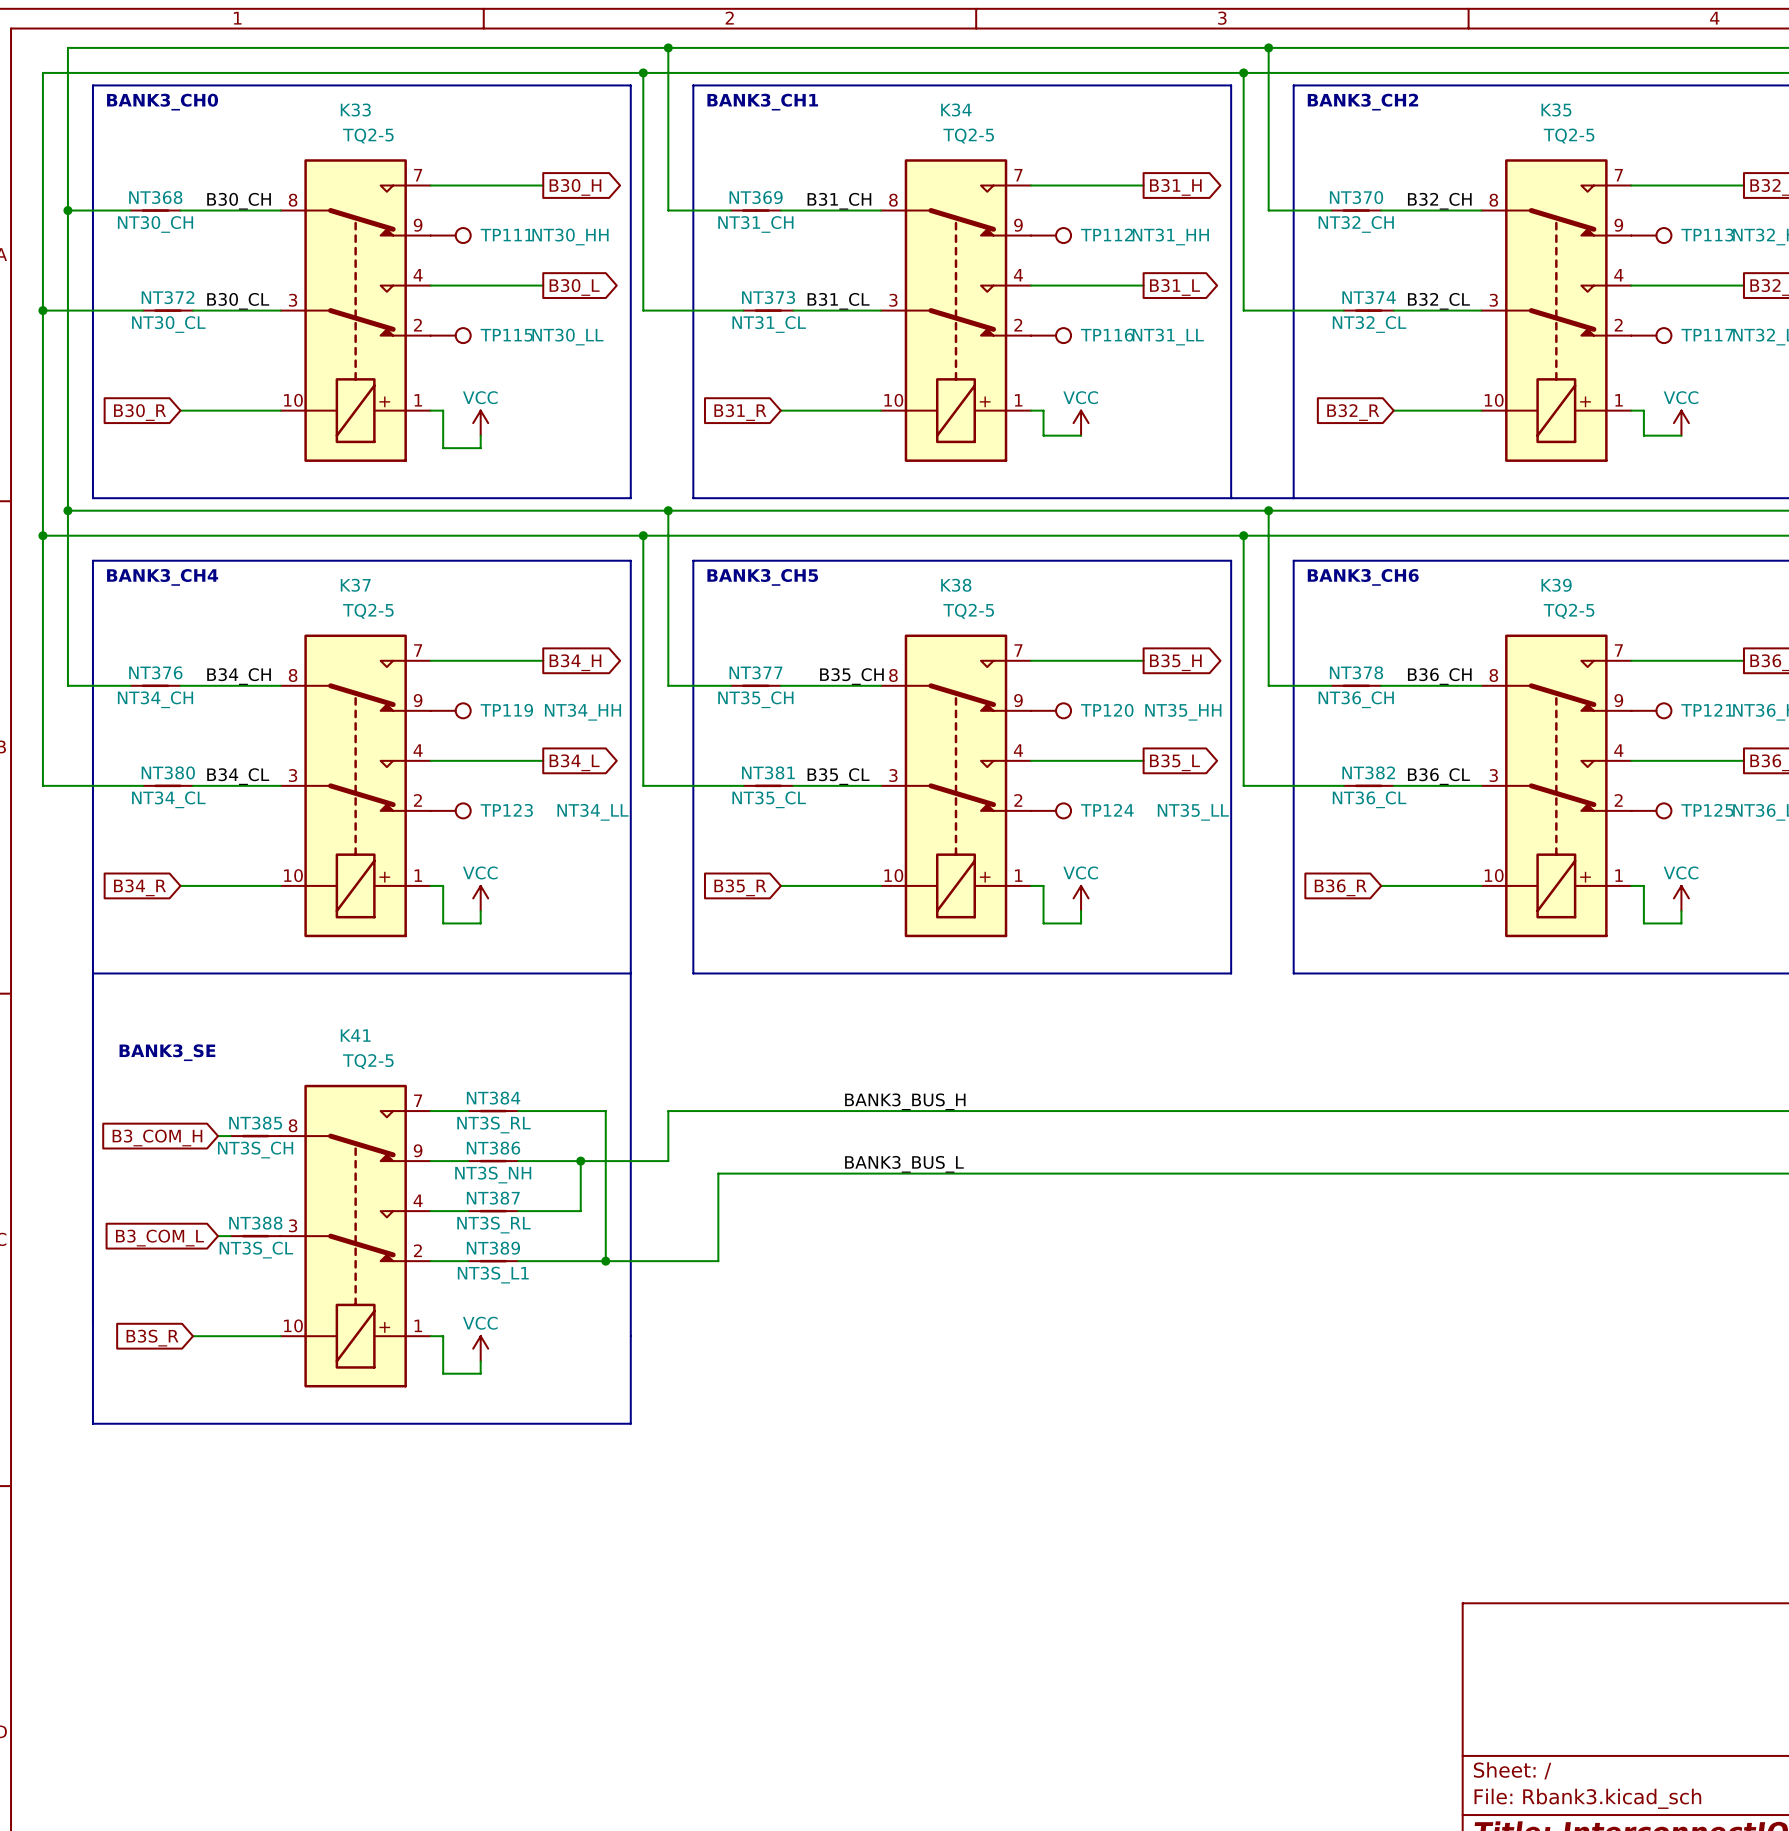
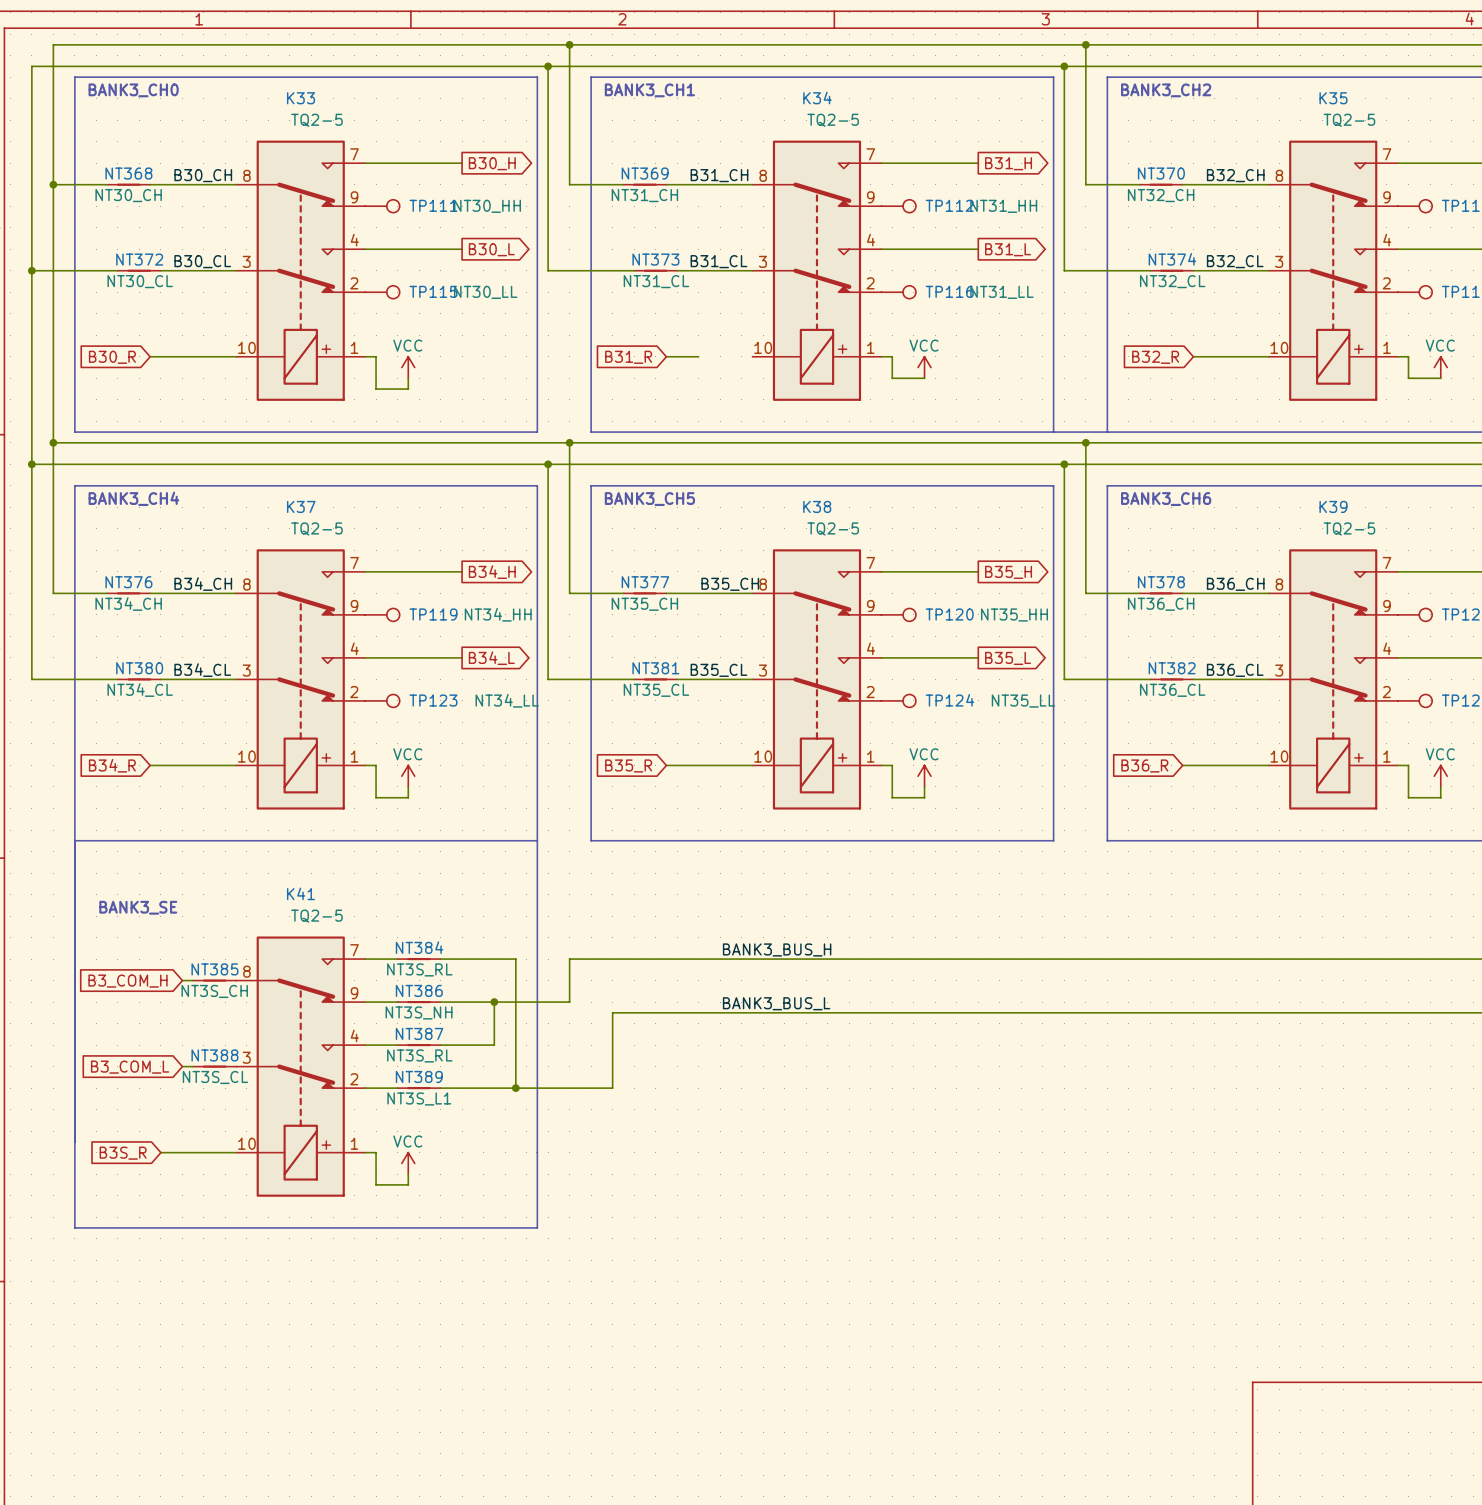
wire: (818, 410) (880, 410) -> none

